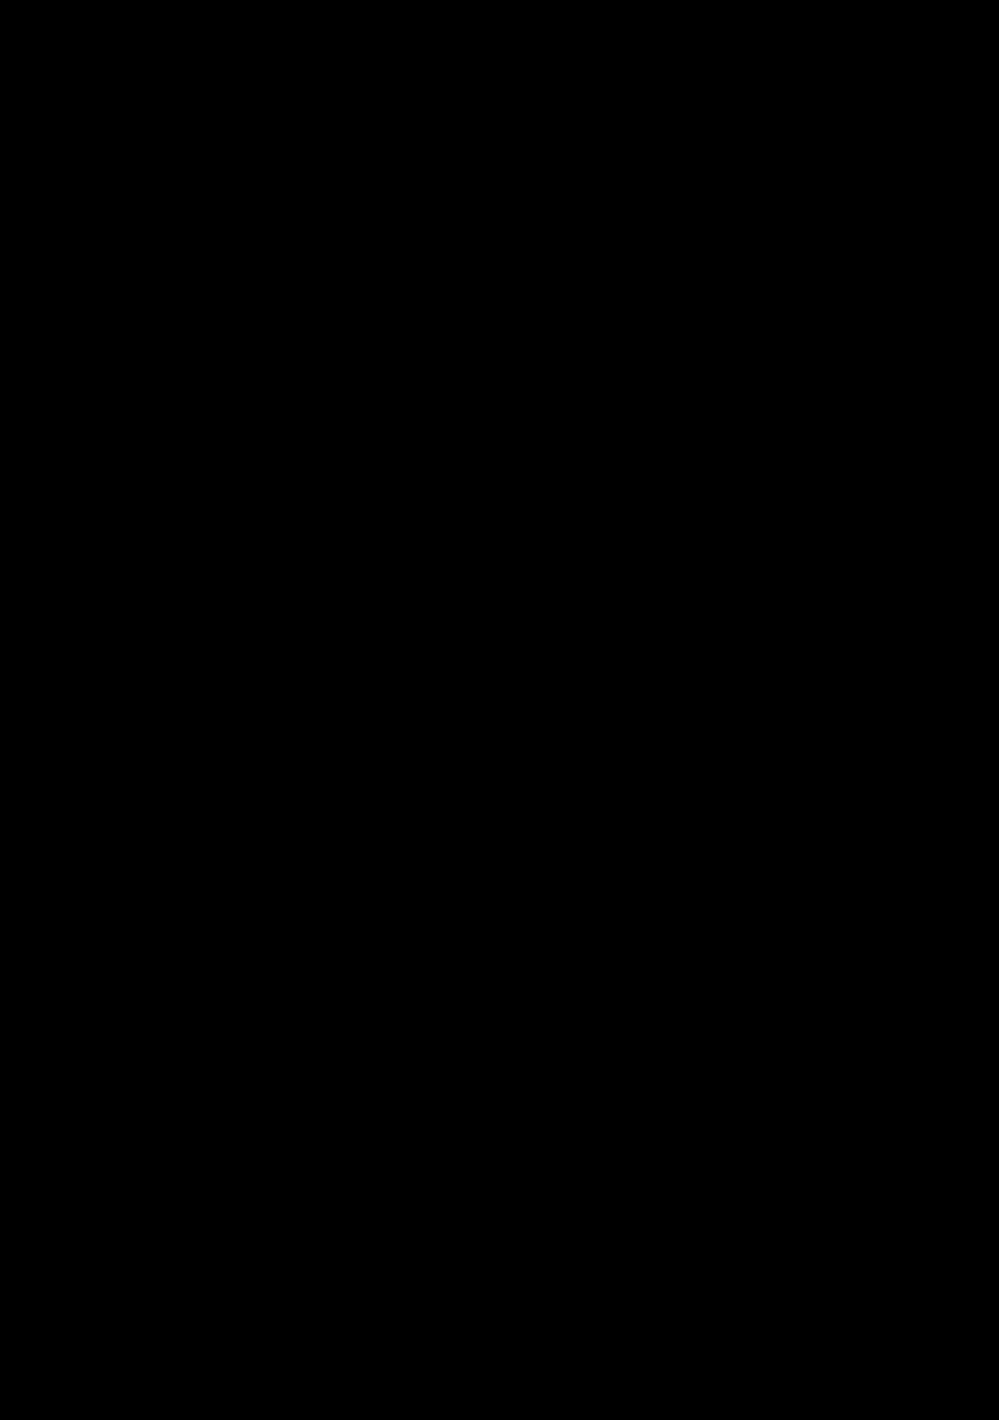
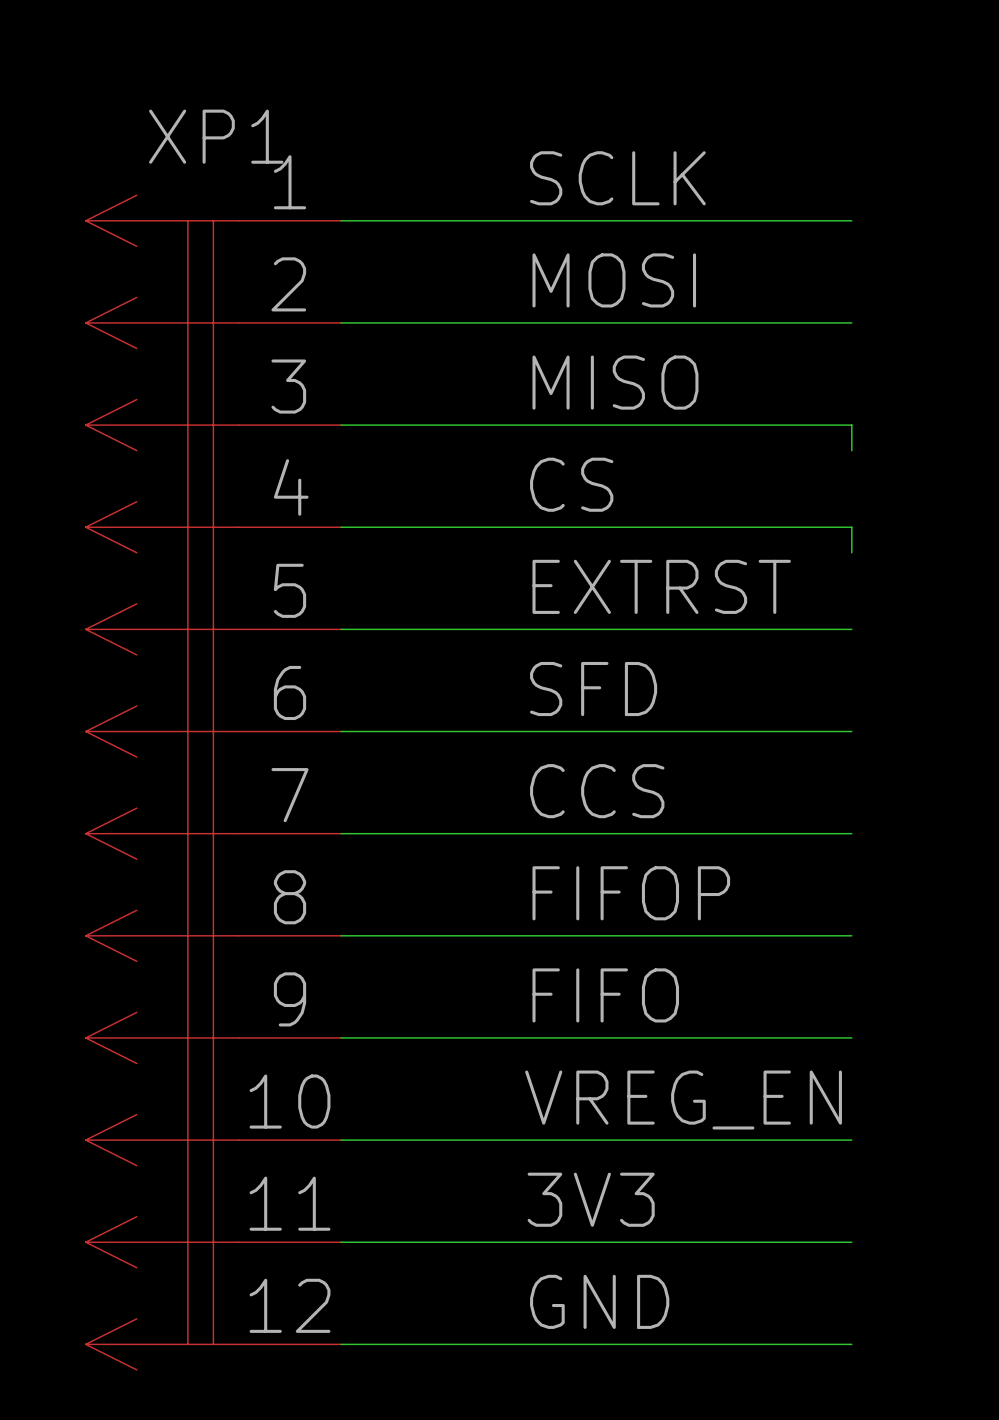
label: none -> SCLK (617, 178)
wire: none -> (341, 220) (851, 220)
label: none -> MOSI (614, 280)
wire: none -> (341, 322) (851, 322)
label: none -> MISO (615, 382)
wire: none -> (341, 425) (851, 425) (851, 450)
label: none -> CS (571, 484)
wire: none -> (341, 527) (851, 527) (851, 552)
label: none -> EXTRST (661, 586)
wire: none -> (341, 629) (851, 629)
label: none -> SFD (593, 689)
wire: none -> (341, 731) (851, 731)
XP1: none -> (213, 782)
label: none -> CCS (597, 791)
wire: none -> (341, 833) (851, 833)
label: none -> FIFOP (631, 893)
wire: none -> (341, 935) (851, 935)
label: none -> FIFO (605, 995)
wire: none -> (341, 1037) (851, 1037)
label: none -> VREG_EN (683, 1100)
wire: none -> (341, 1140) (851, 1140)
label: none -> 3V3 (591, 1199)
wire: none -> (341, 1242) (851, 1242)
label: none -> GND (599, 1301)
wire: none -> (341, 1344) (851, 1344)

